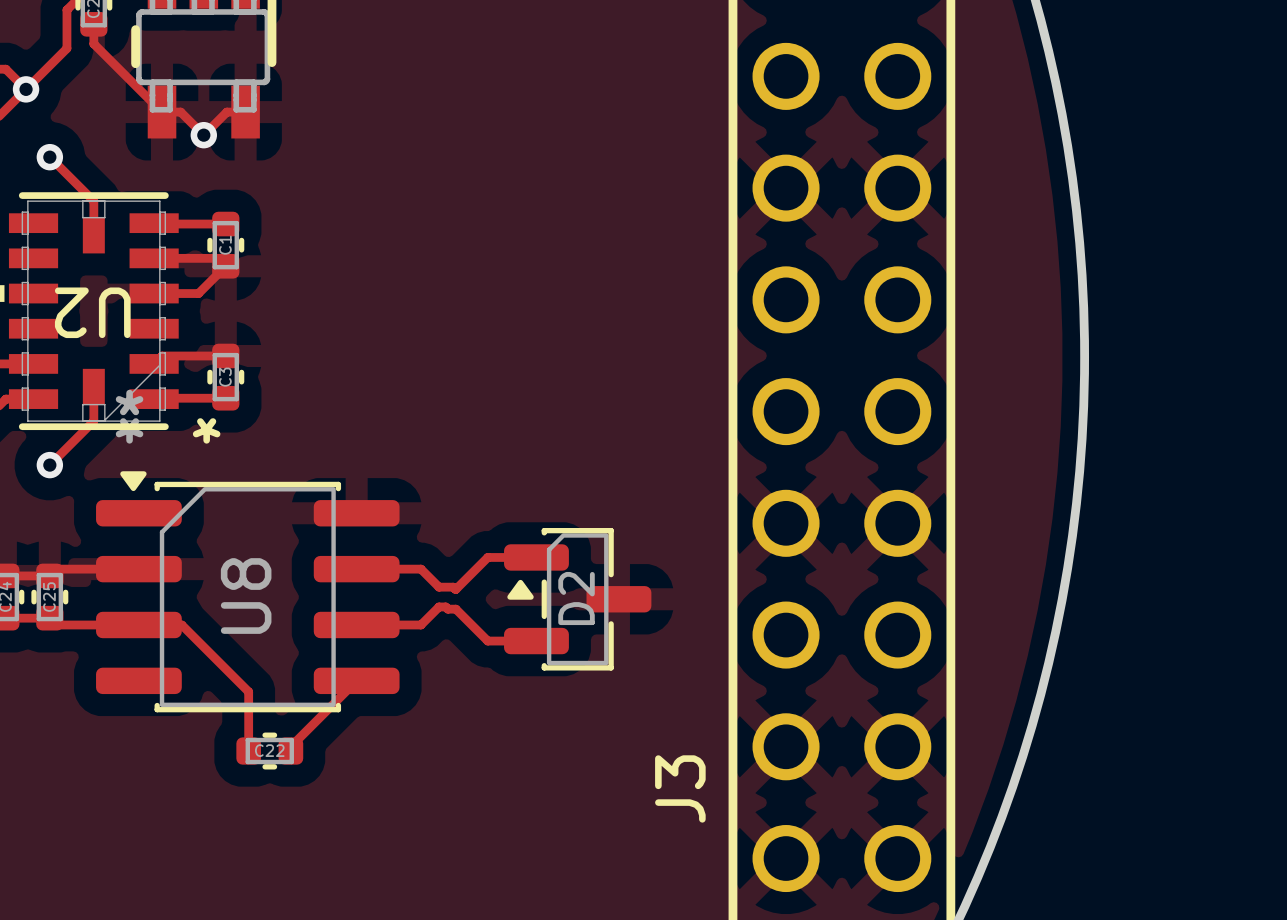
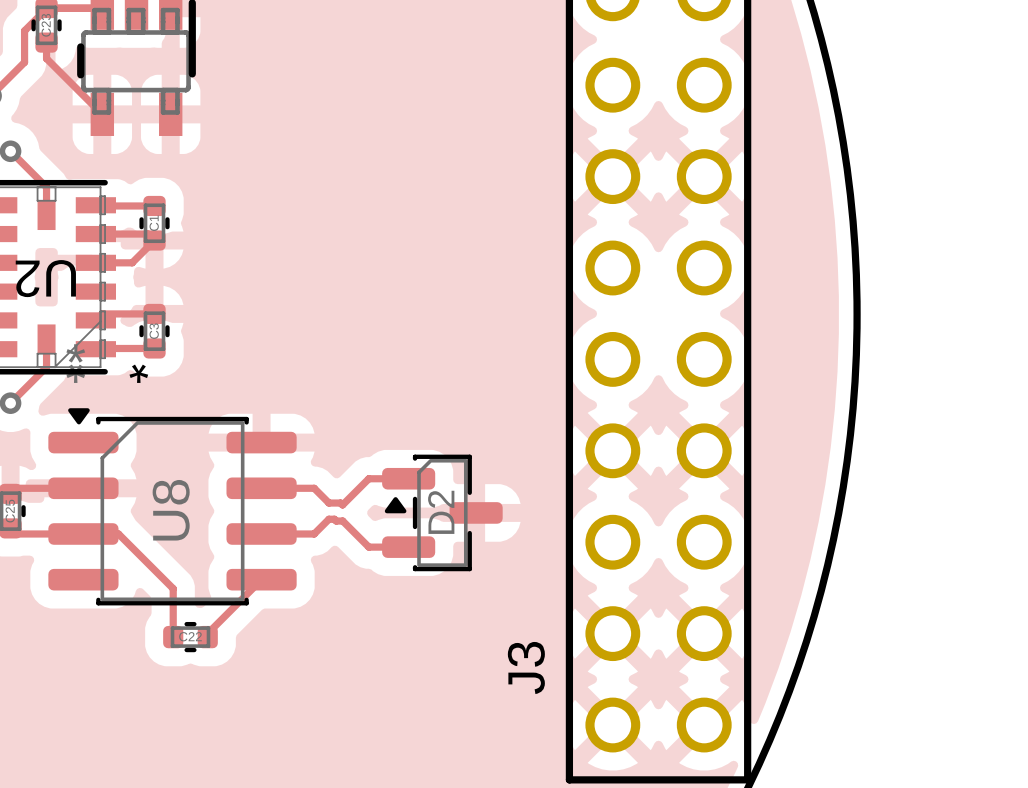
track: (162, 112) (180, 112) (203, 135) (226, 112) (245, 112) -> none
via: (203, 135) -> none

